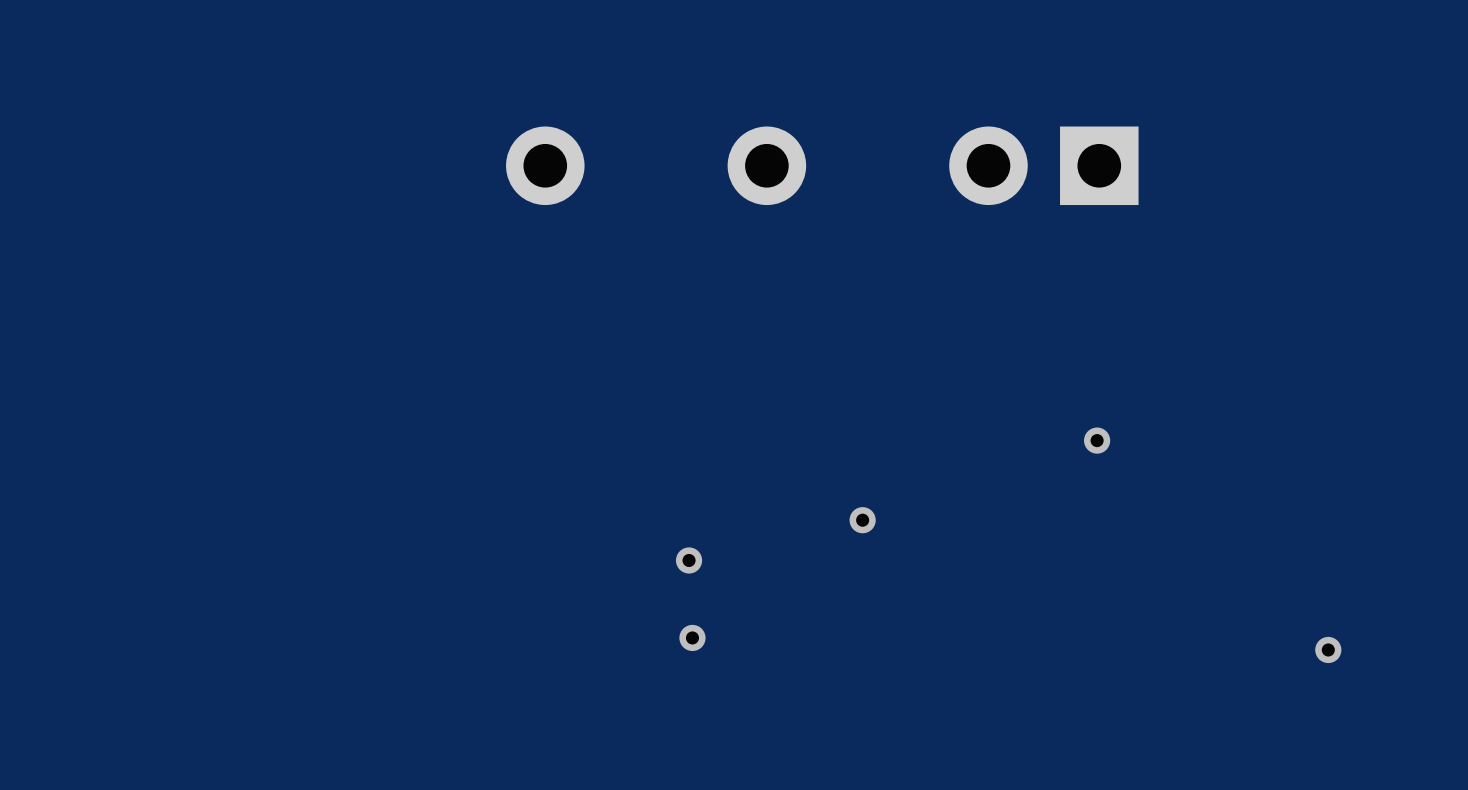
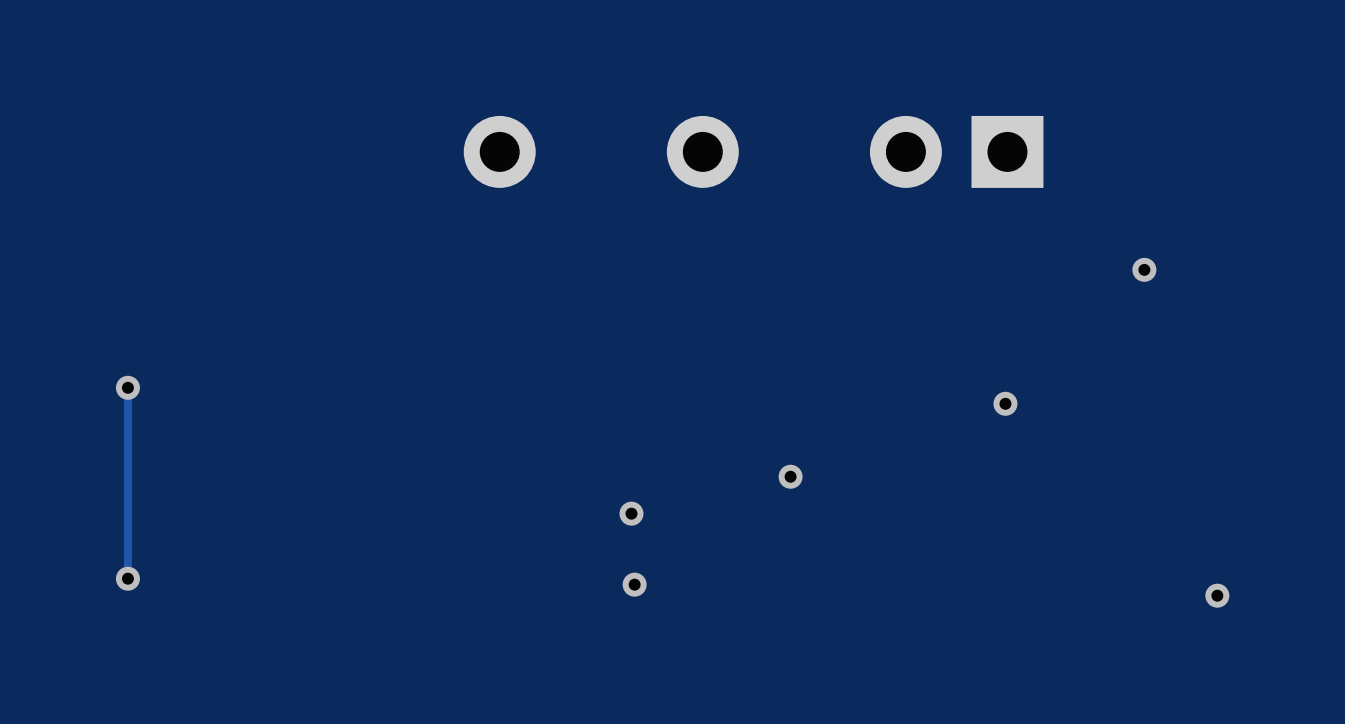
via: none -> (1144, 269)
track: none -> (127, 387) (127, 578)
via: none -> (127, 387)
via: none -> (127, 578)

